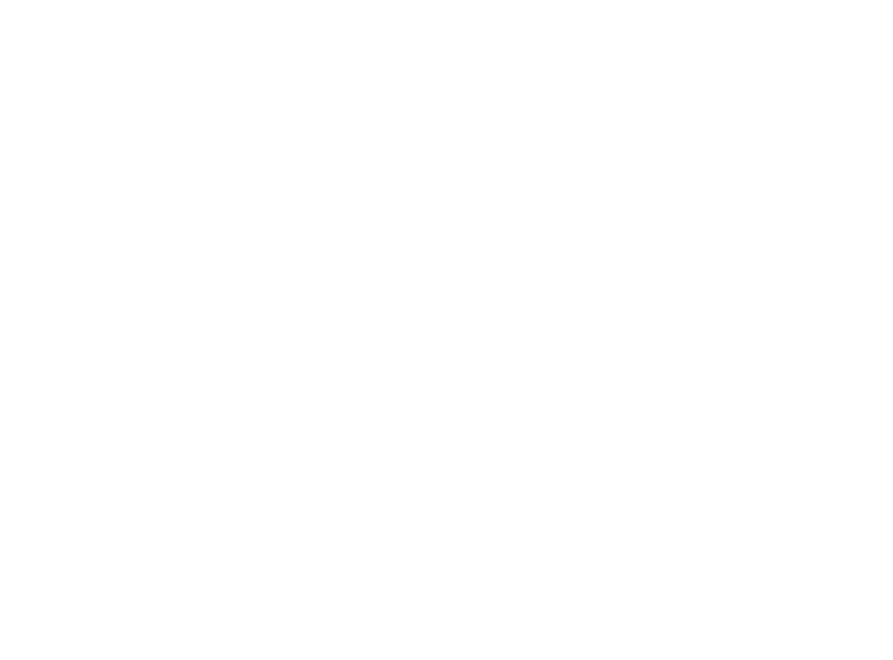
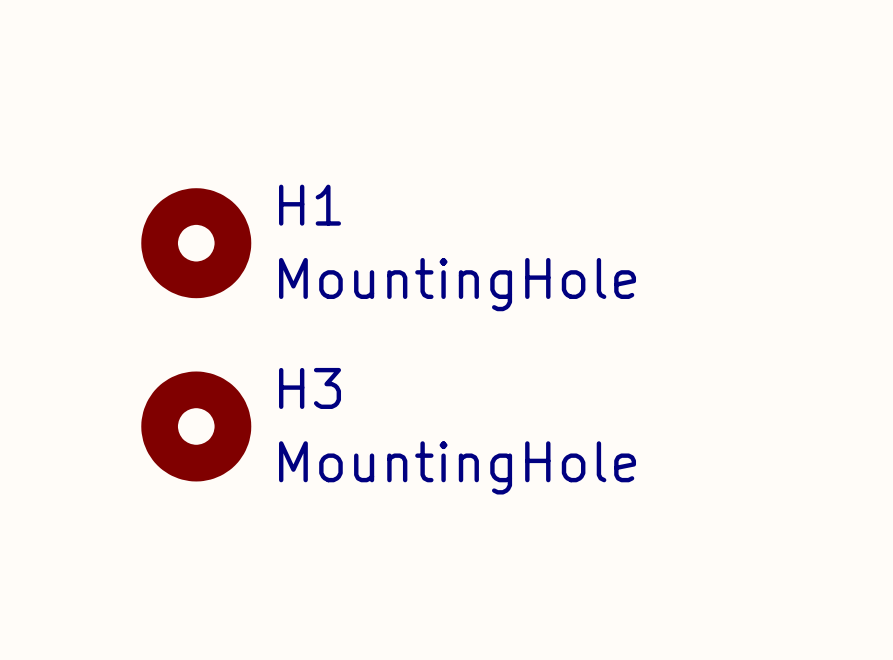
H1: none -> MountingHole (196, 243)
H3: none -> MountingHole (196, 426)

